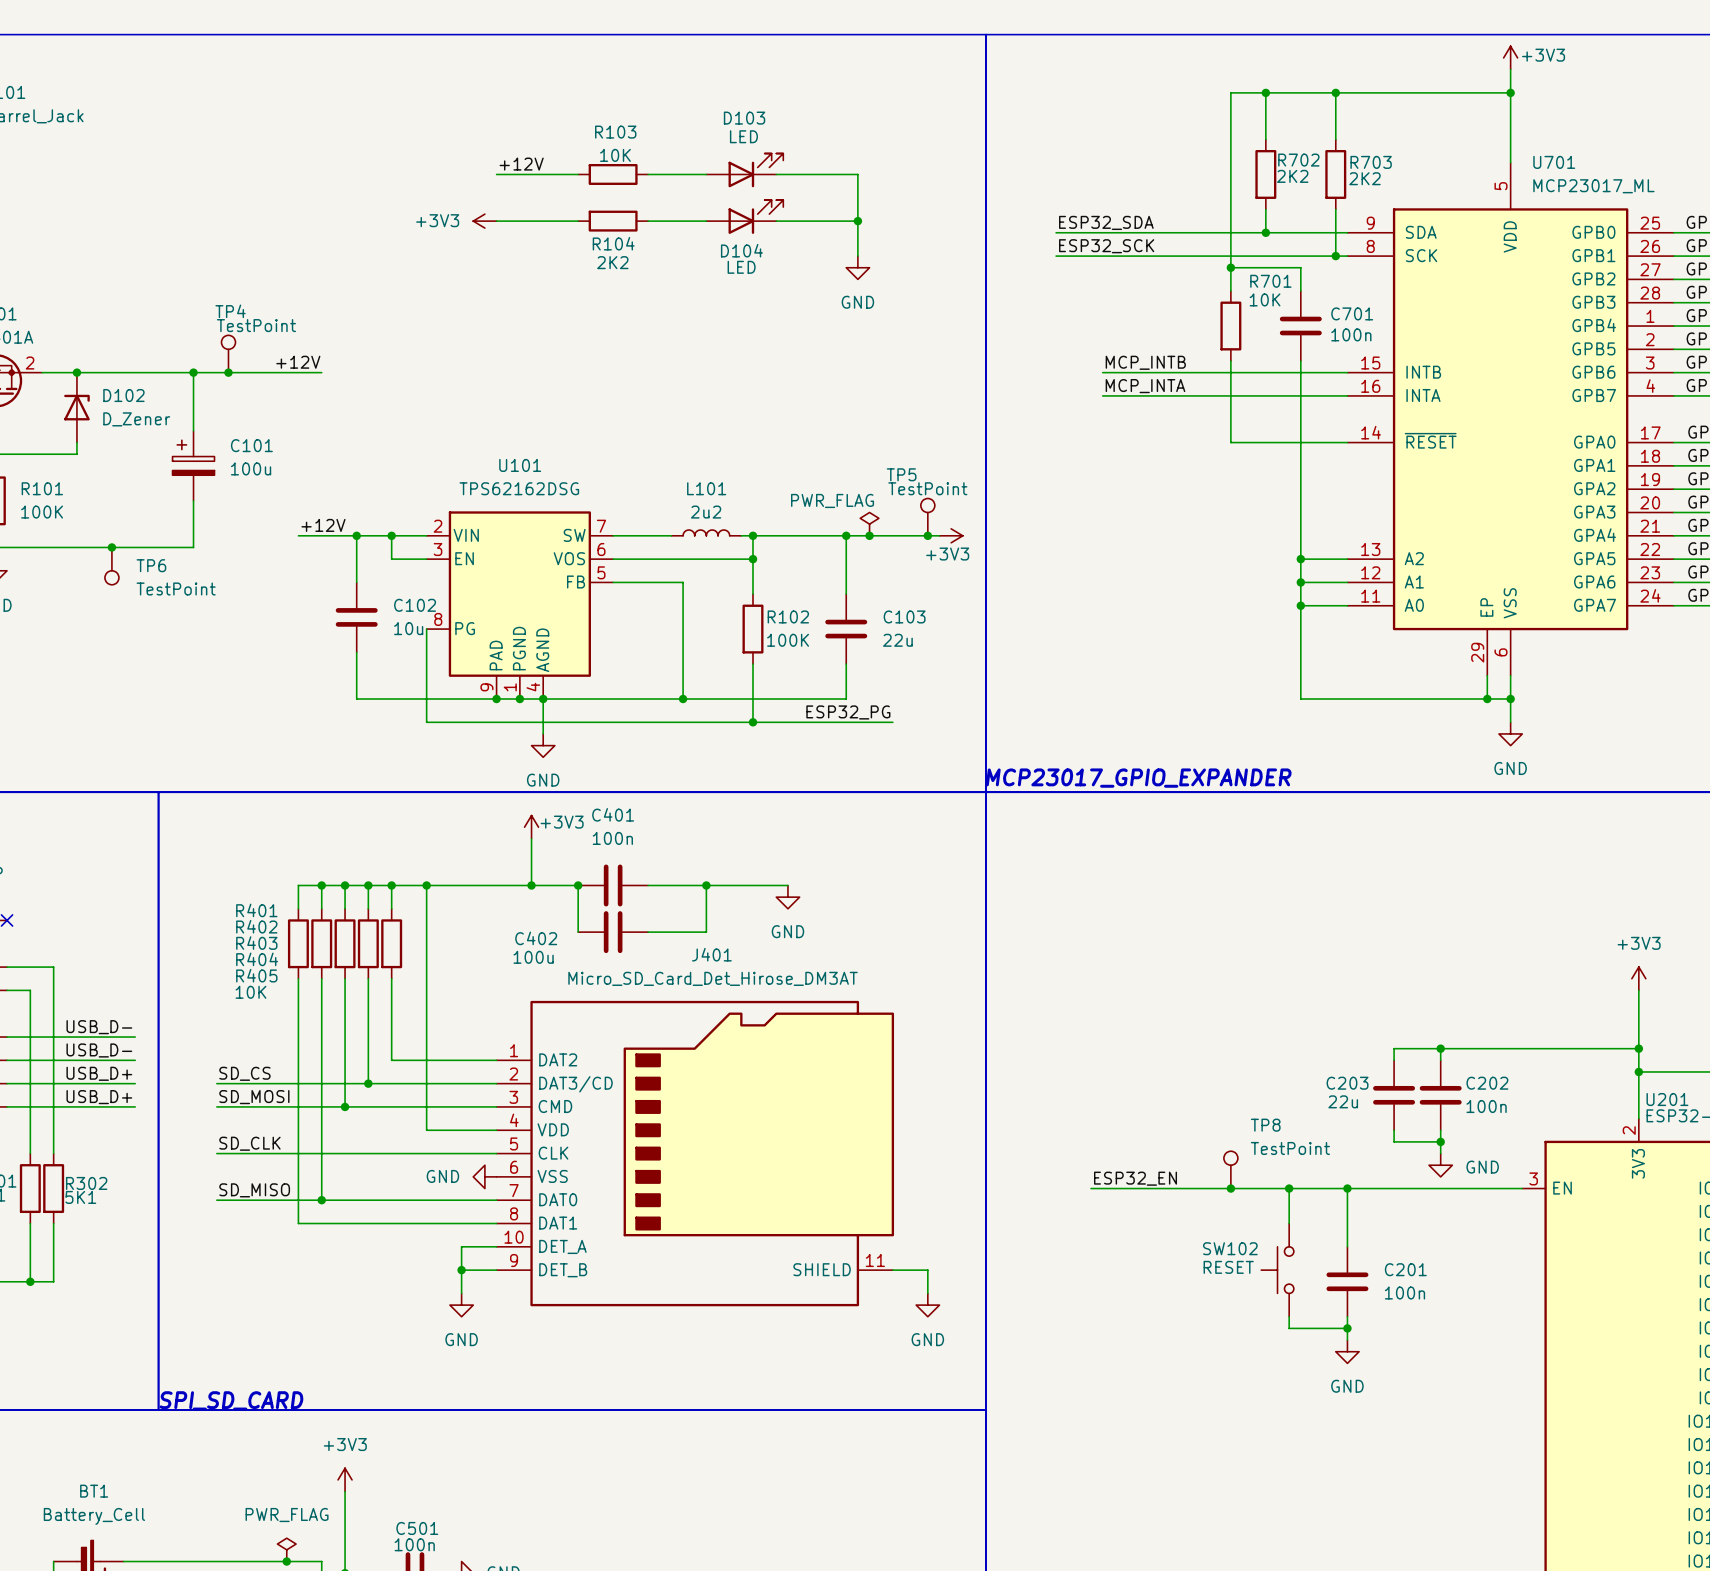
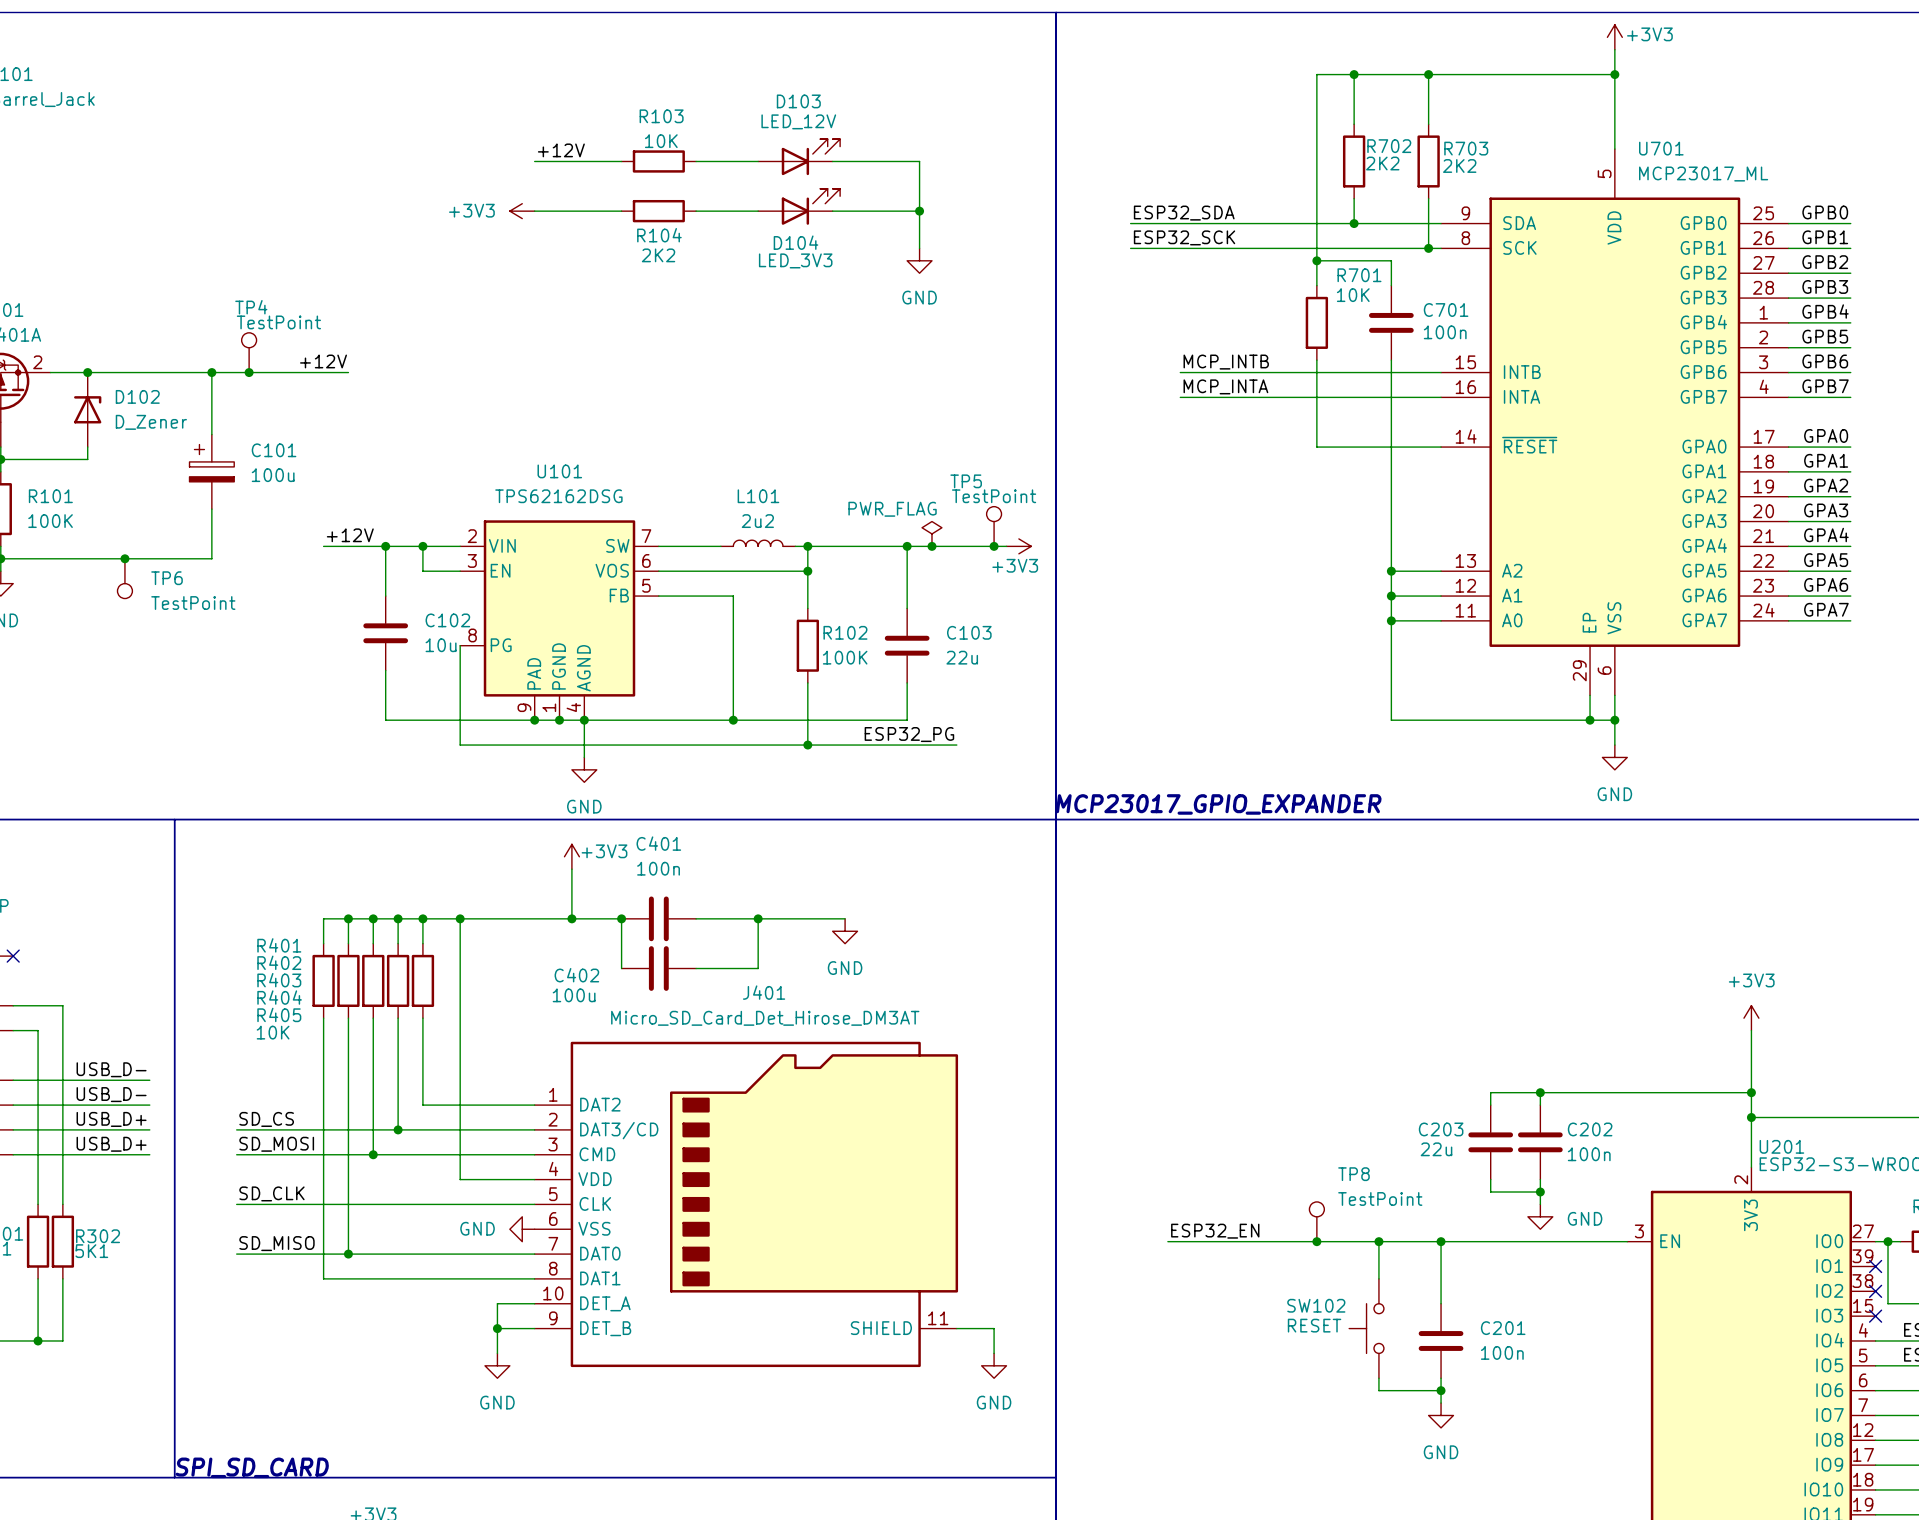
D103 value: LED (743, 136) -> LED_12V (798, 121)
D104 value: LED (741, 267) -> LED_3V3 (795, 260)

